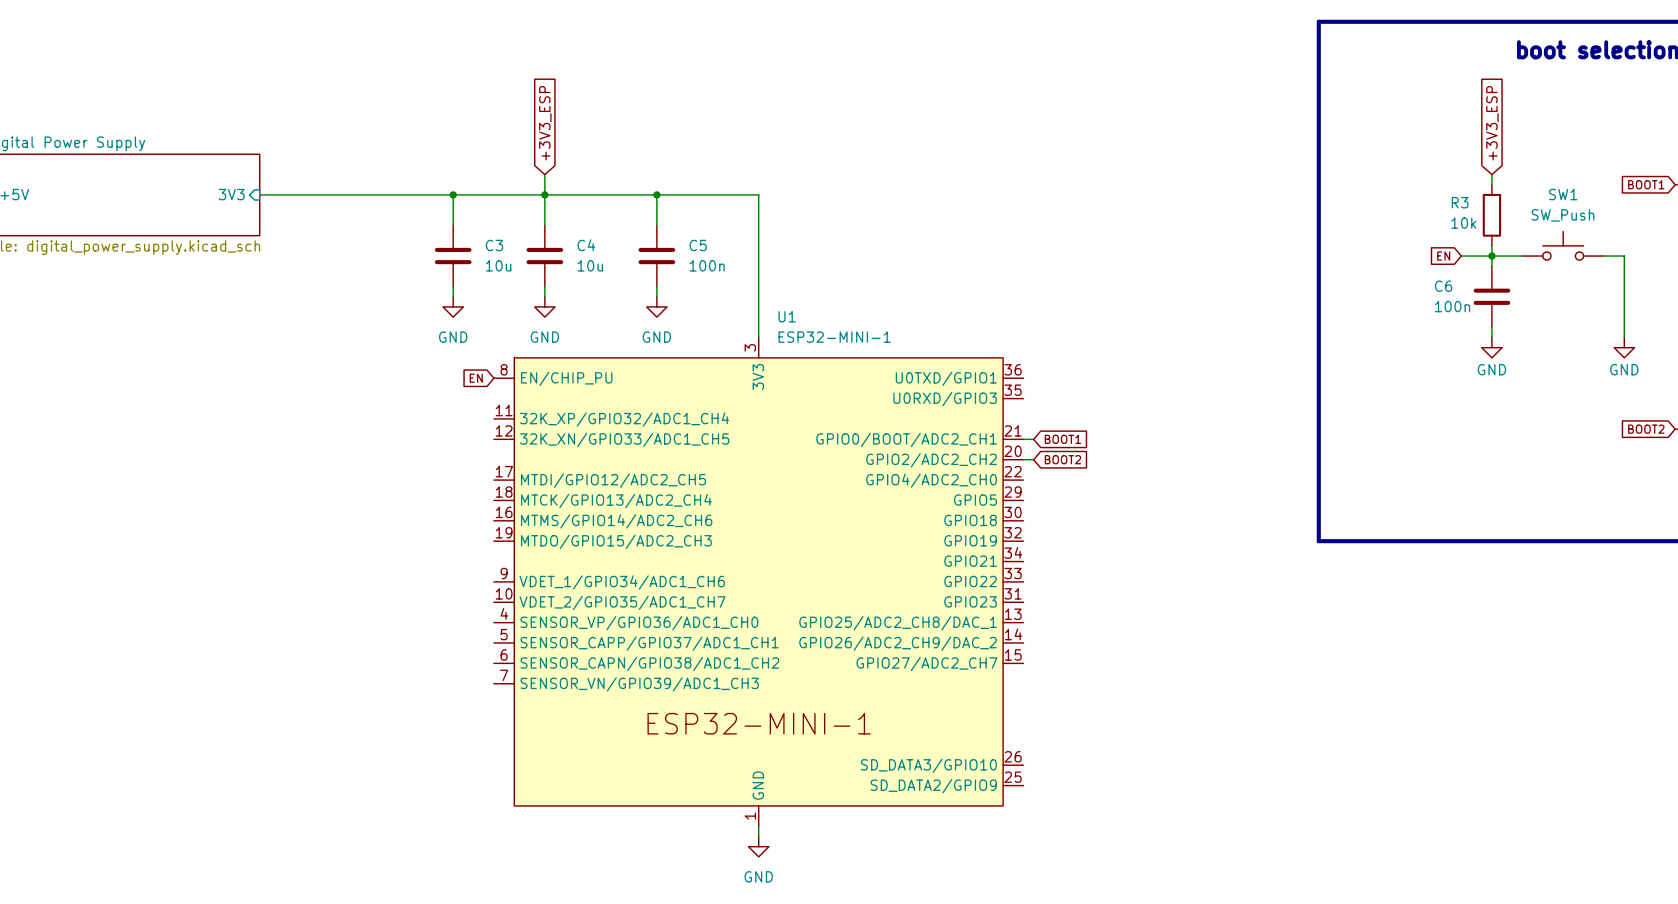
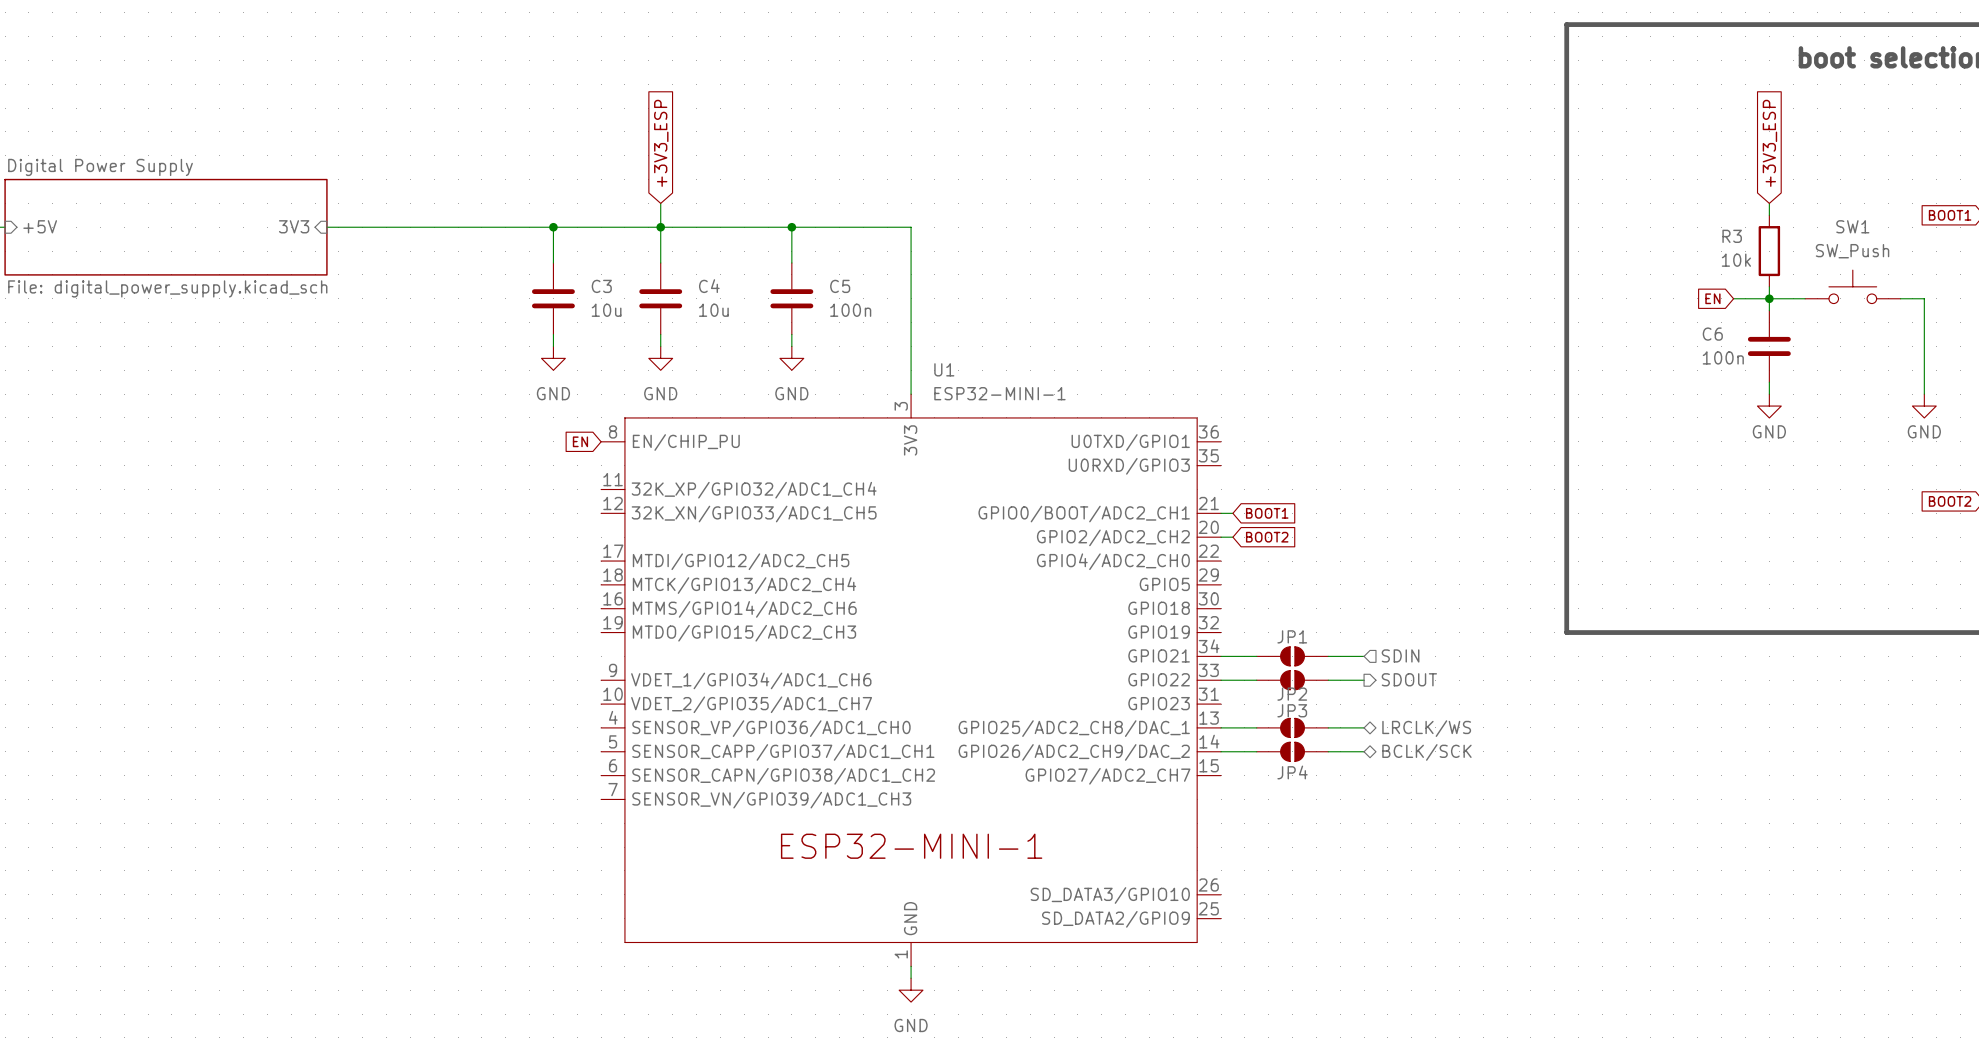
wire: none -> (1221, 656) (1256, 656)
JP1: none -> (1292, 656)
wire: none -> (1328, 656) (1364, 656)
hierarchical label: none -> SDIN (1400, 655)
wire: none -> (1221, 680) (1256, 680)
JP2: none -> (1292, 680)
wire: none -> (1328, 680) (1364, 680)
hierarchical label: none -> SDOUT (1409, 679)
wire: none -> (1221, 727) (1256, 727)
JP3: none -> (1292, 727)
wire: none -> (1328, 727) (1364, 727)
hierarchical label: none -> LRCLK/WS (1426, 728)
wire: none -> (1221, 751) (1256, 751)
JP4: none -> (1292, 751)
wire: none -> (1328, 751) (1364, 751)
hierarchical label: none -> BCLK/SCK (1426, 752)

